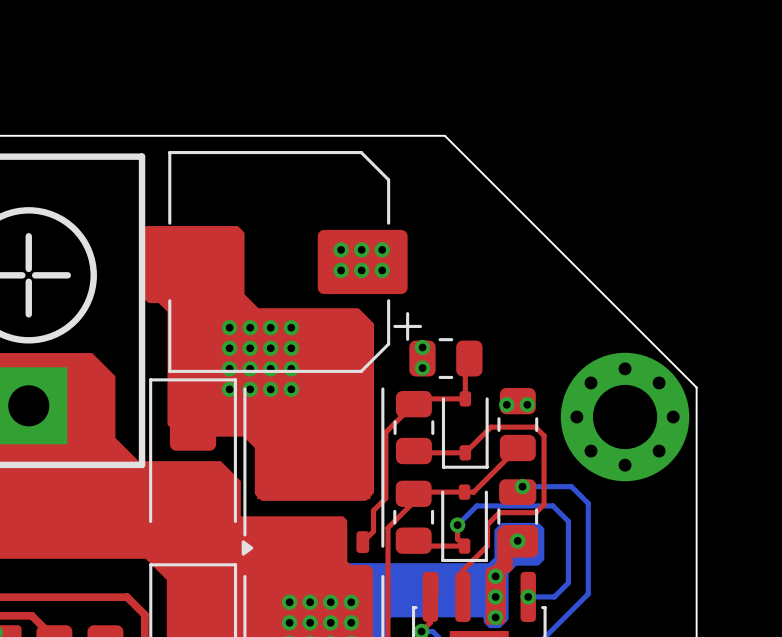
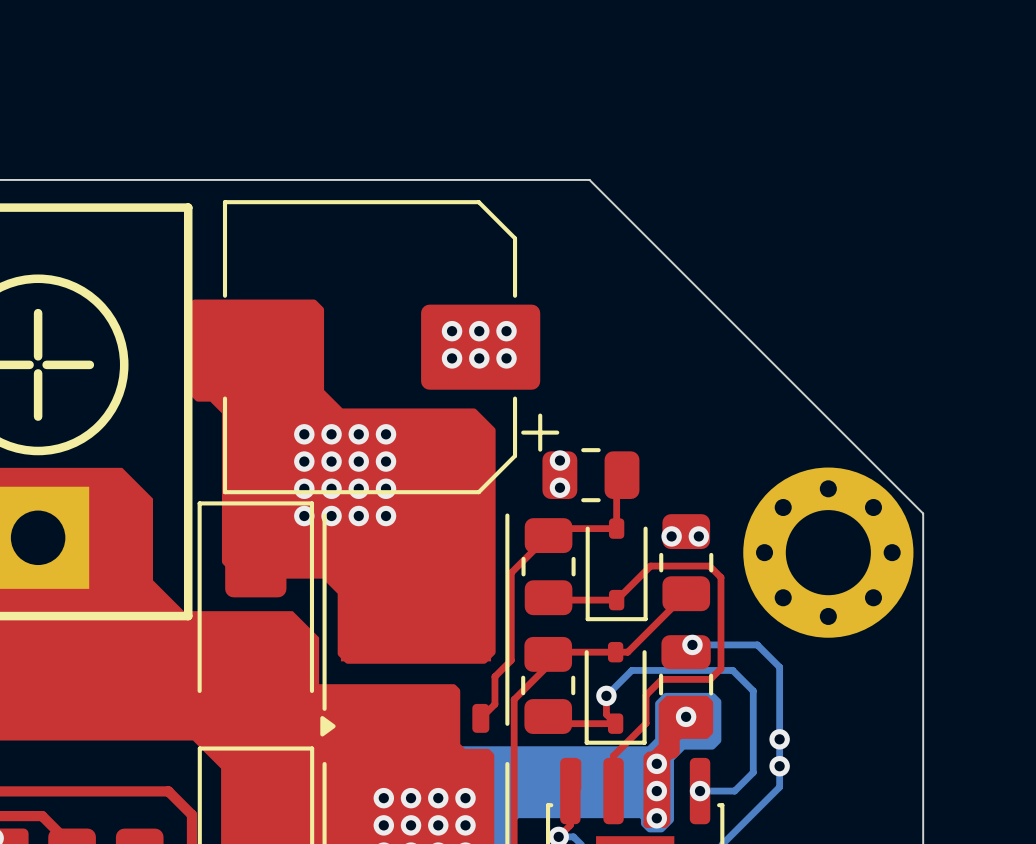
via: none -> (779, 739)
via: none -> (779, 766)

